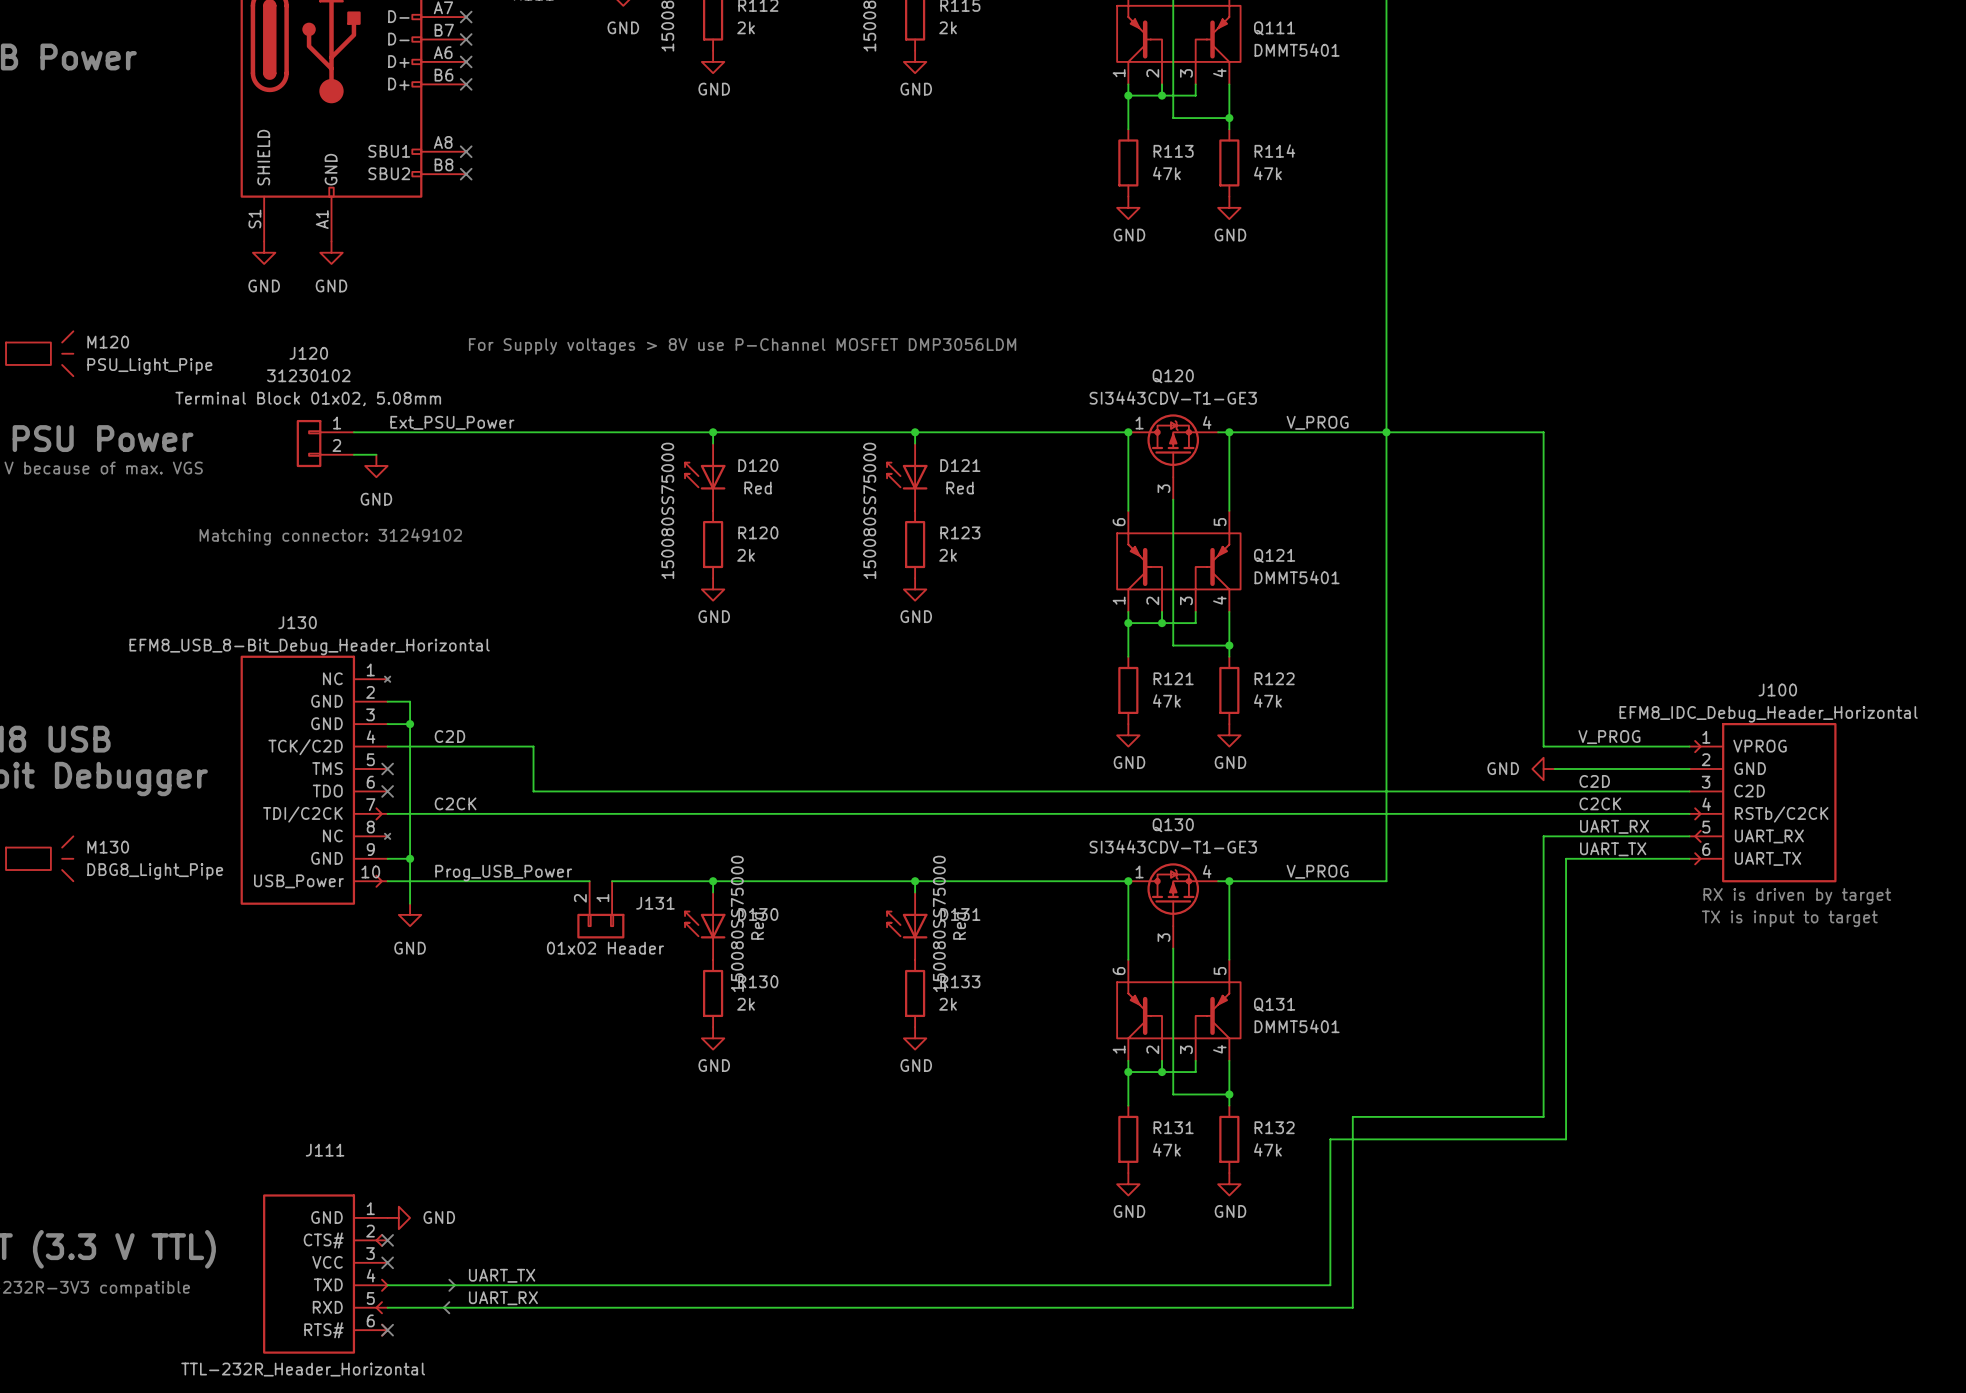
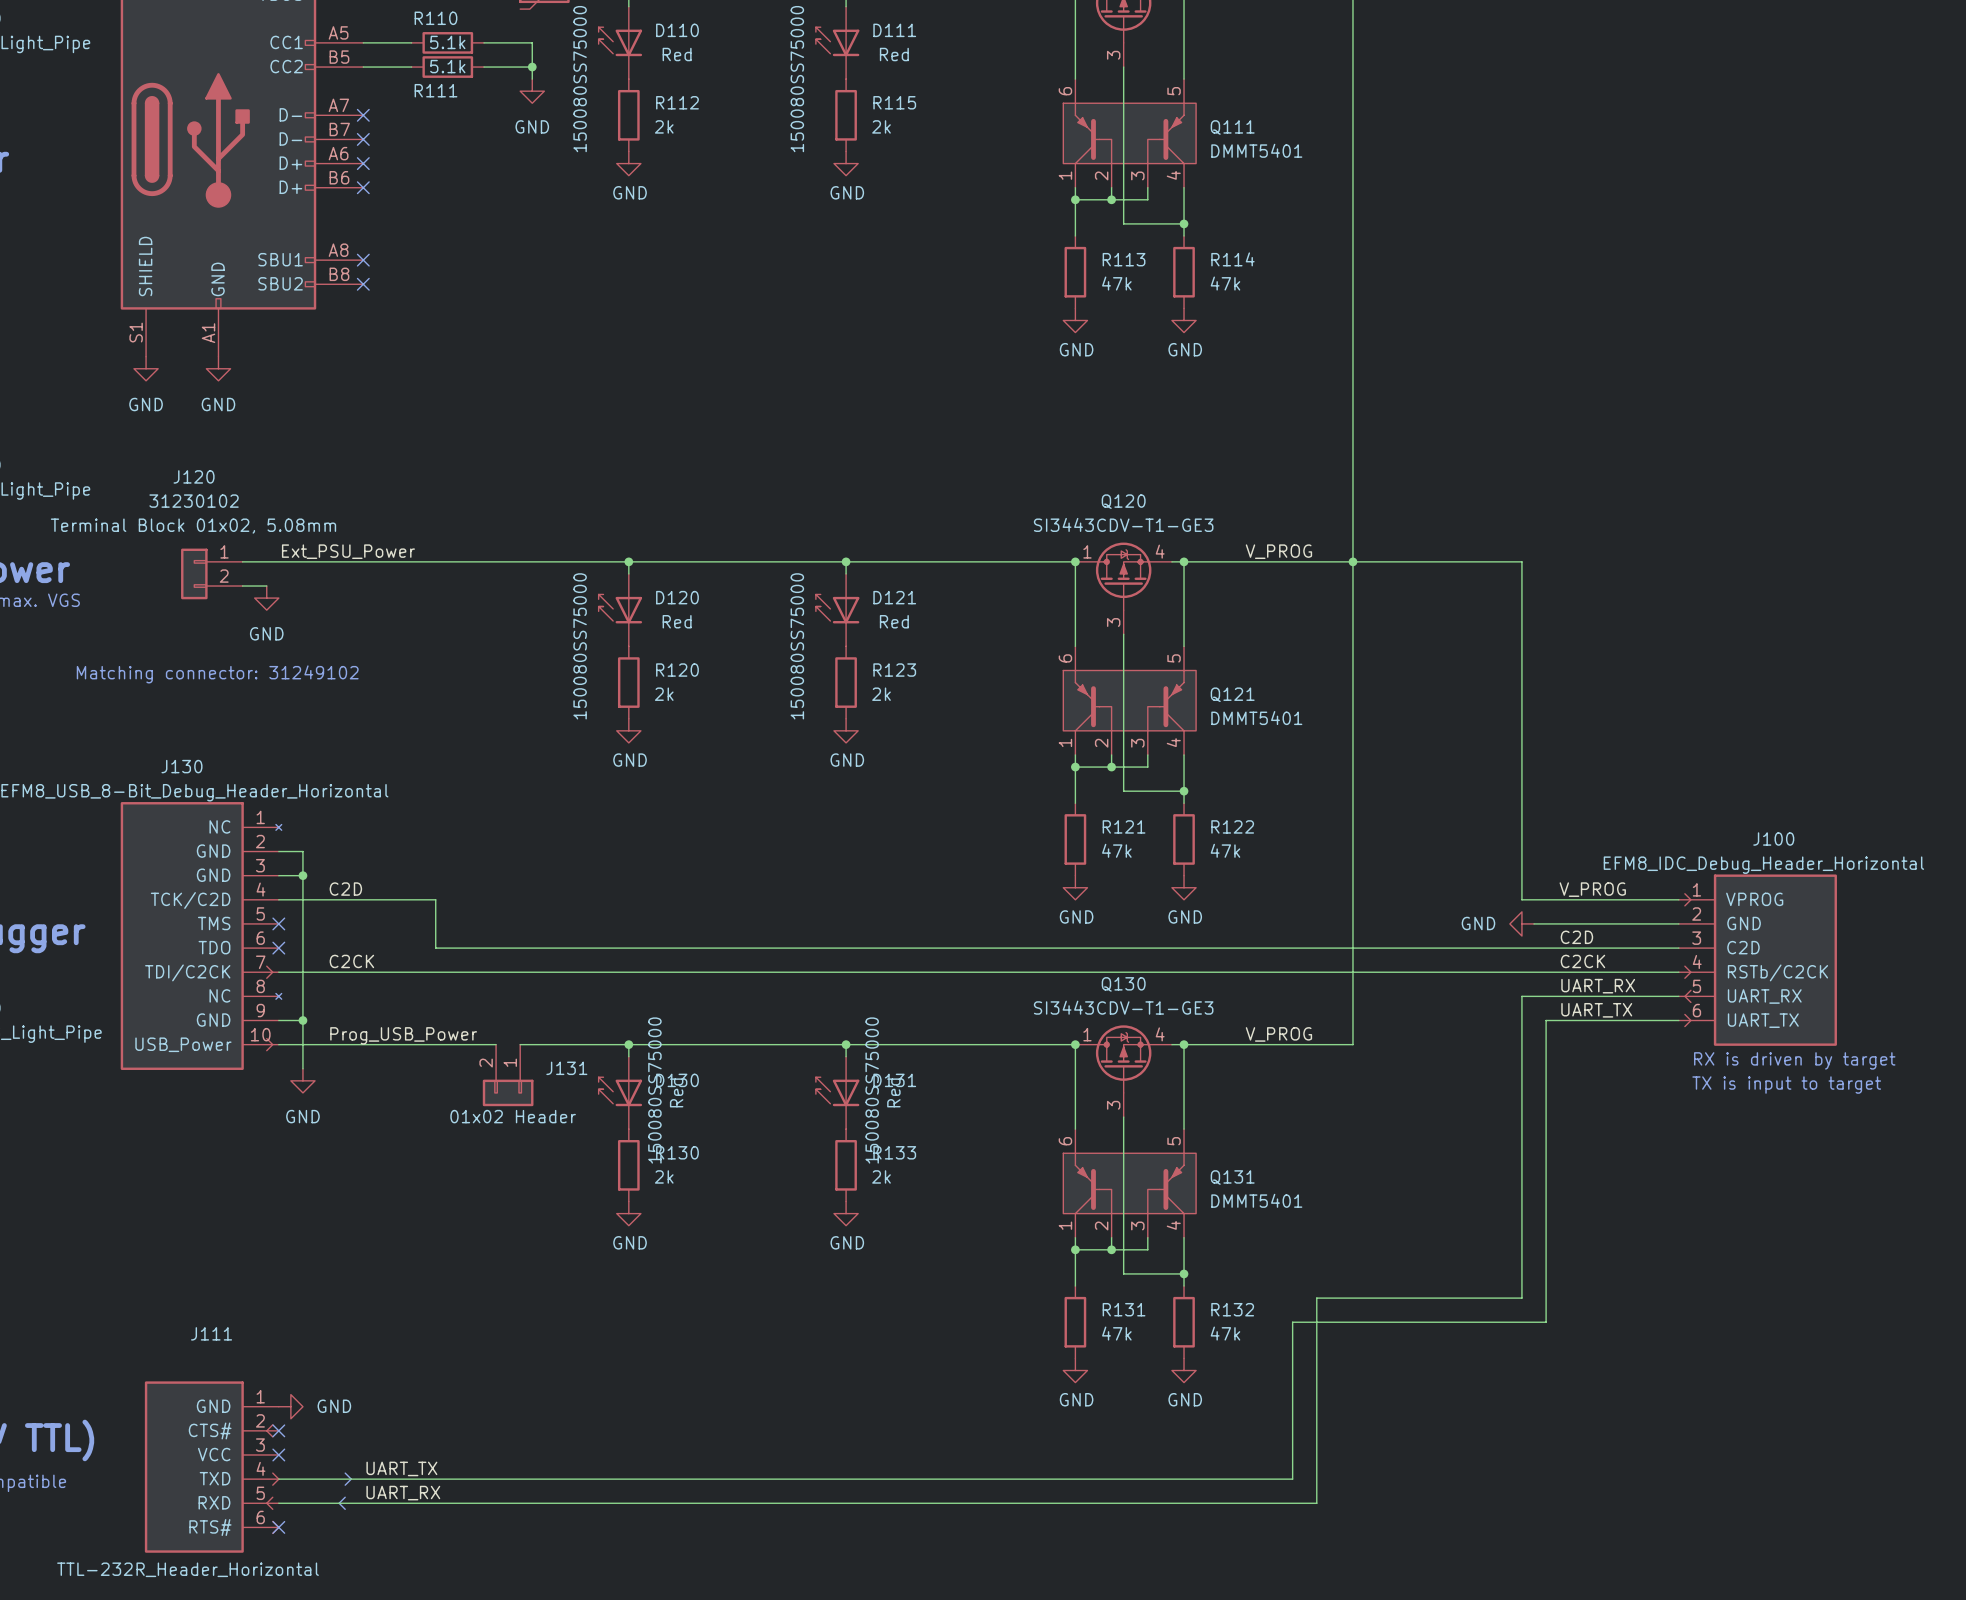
text: For Supply voltages > 8V use P-Channel MOSFET DMP3056LDM (742, 346) -> none

